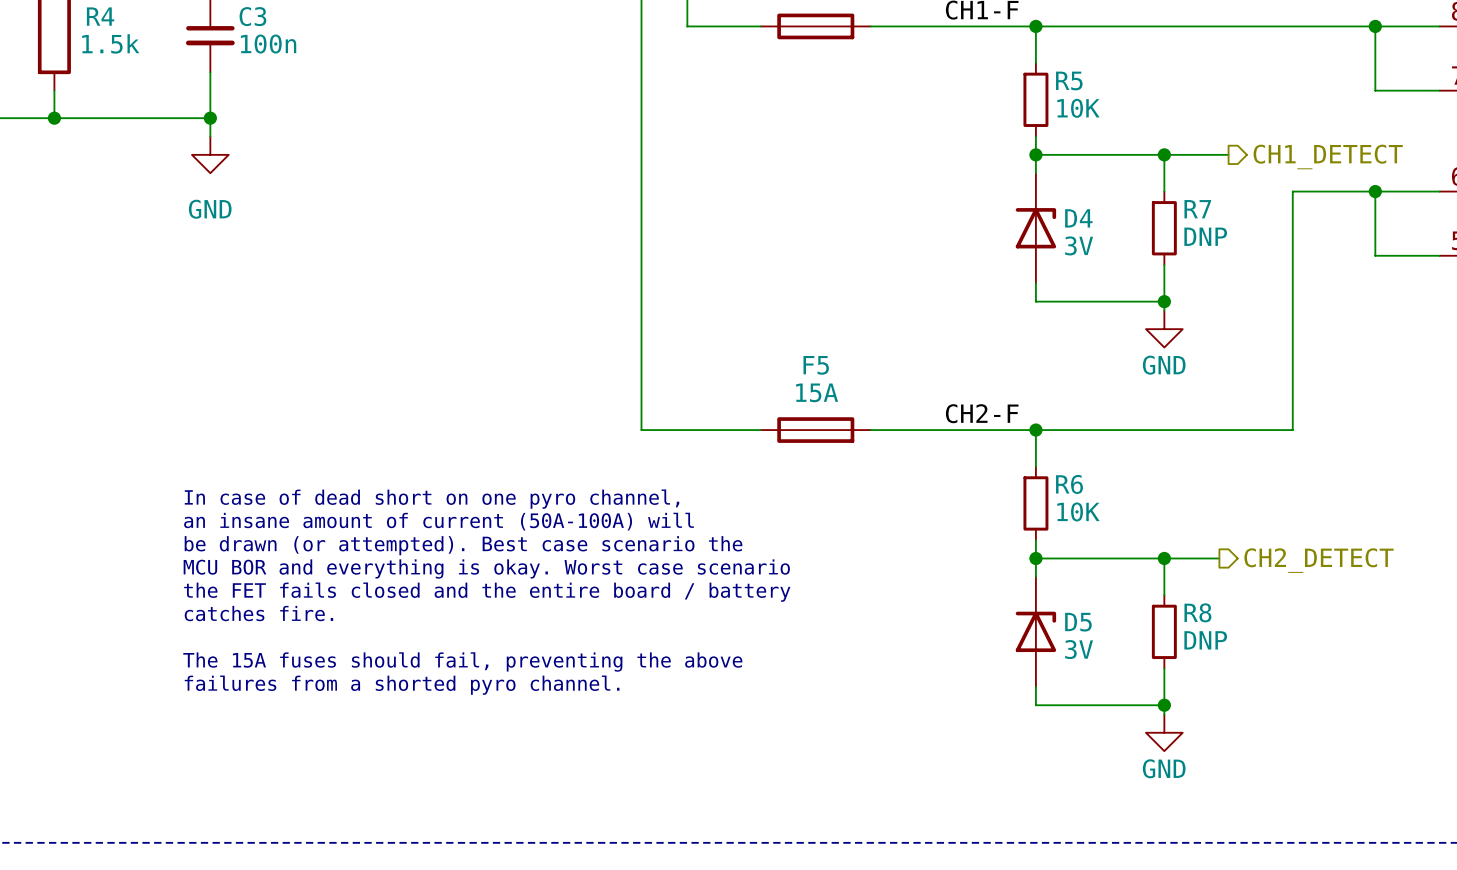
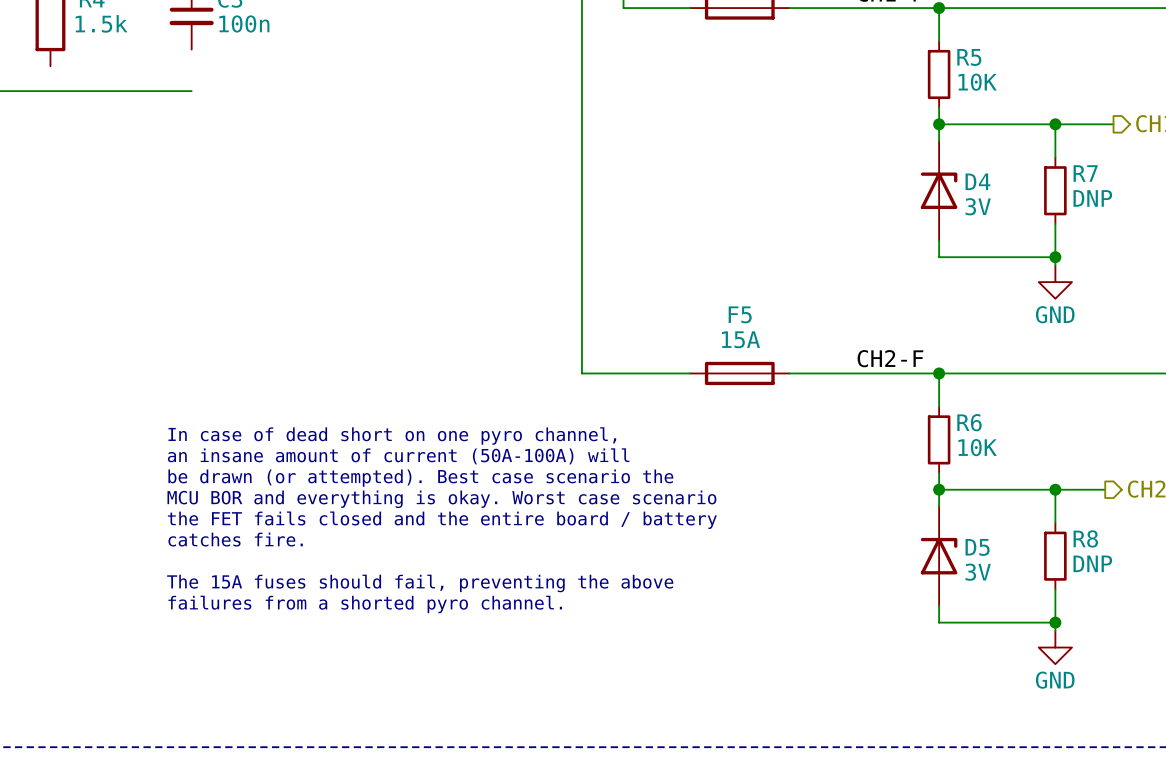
wire: (210, 72) (210, 136) -> none
wire: (54, 90) (54, 118) -> none
junction: (54, 118) -> none
junction: (210, 118) -> none
power symbol: GND (210, 154) -> none

